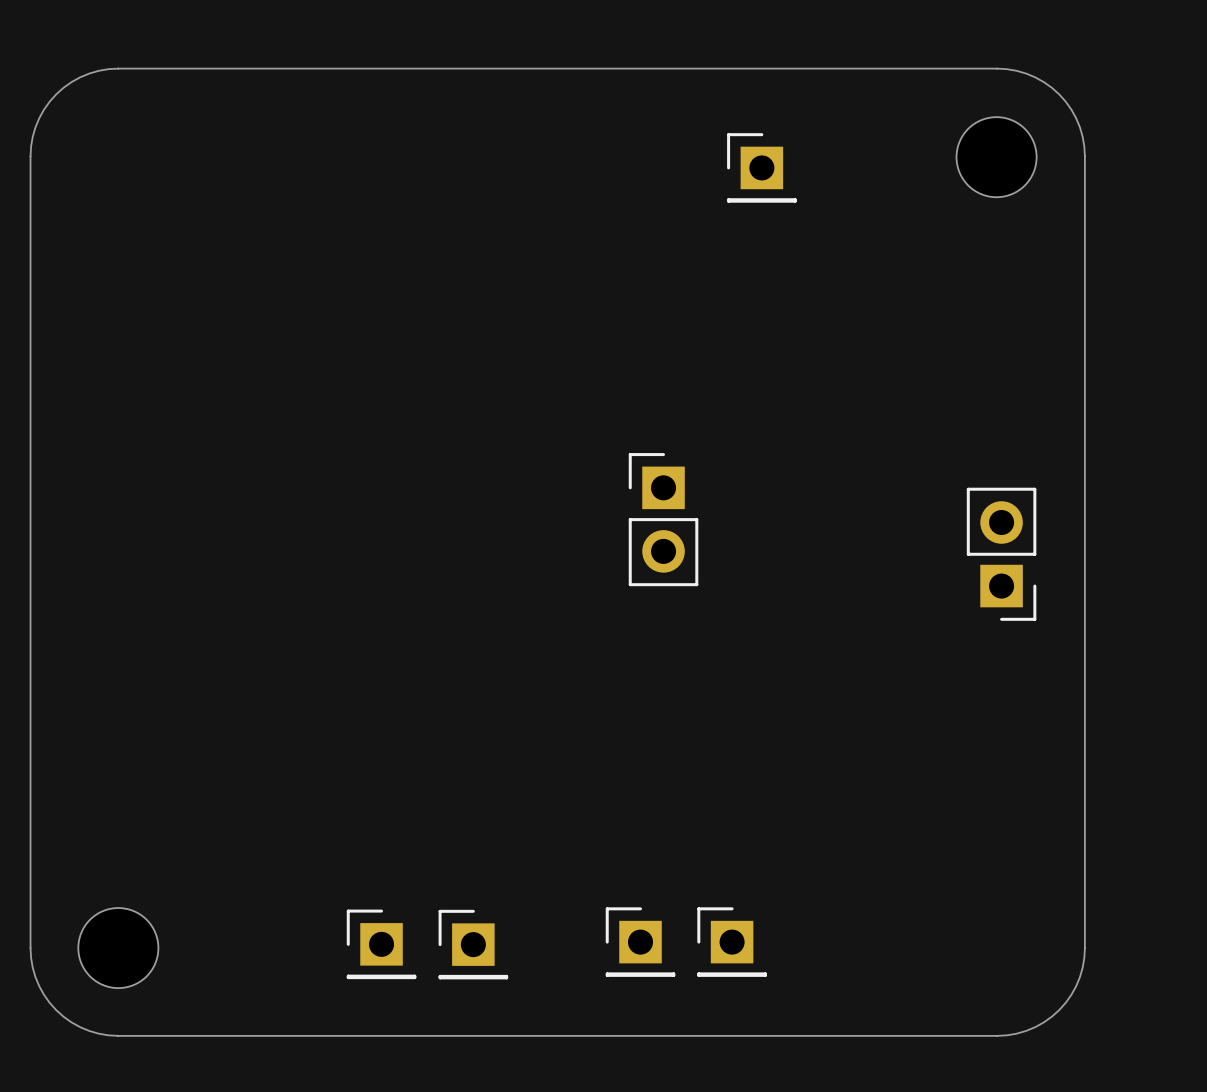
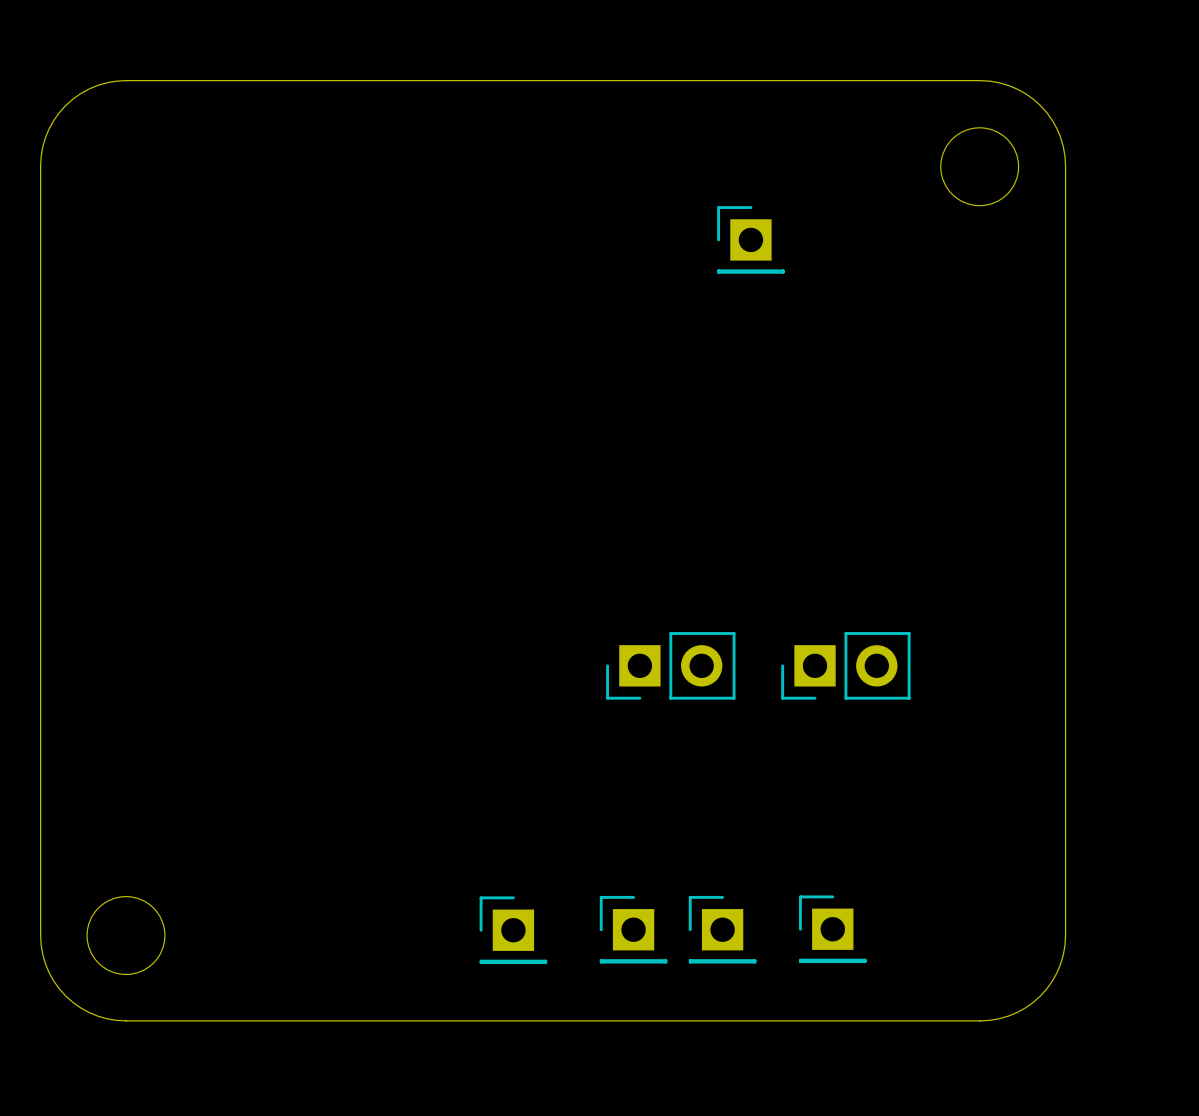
part position: (761, 167) -> (750, 239)
part: (663, 519) -> none
part: (1001, 554) -> none
part: none -> (670, 665)
part: none -> (845, 665)
part: none -> (832, 929)
part: (381, 944) -> none
part position: (473, 944) -> (513, 930)

